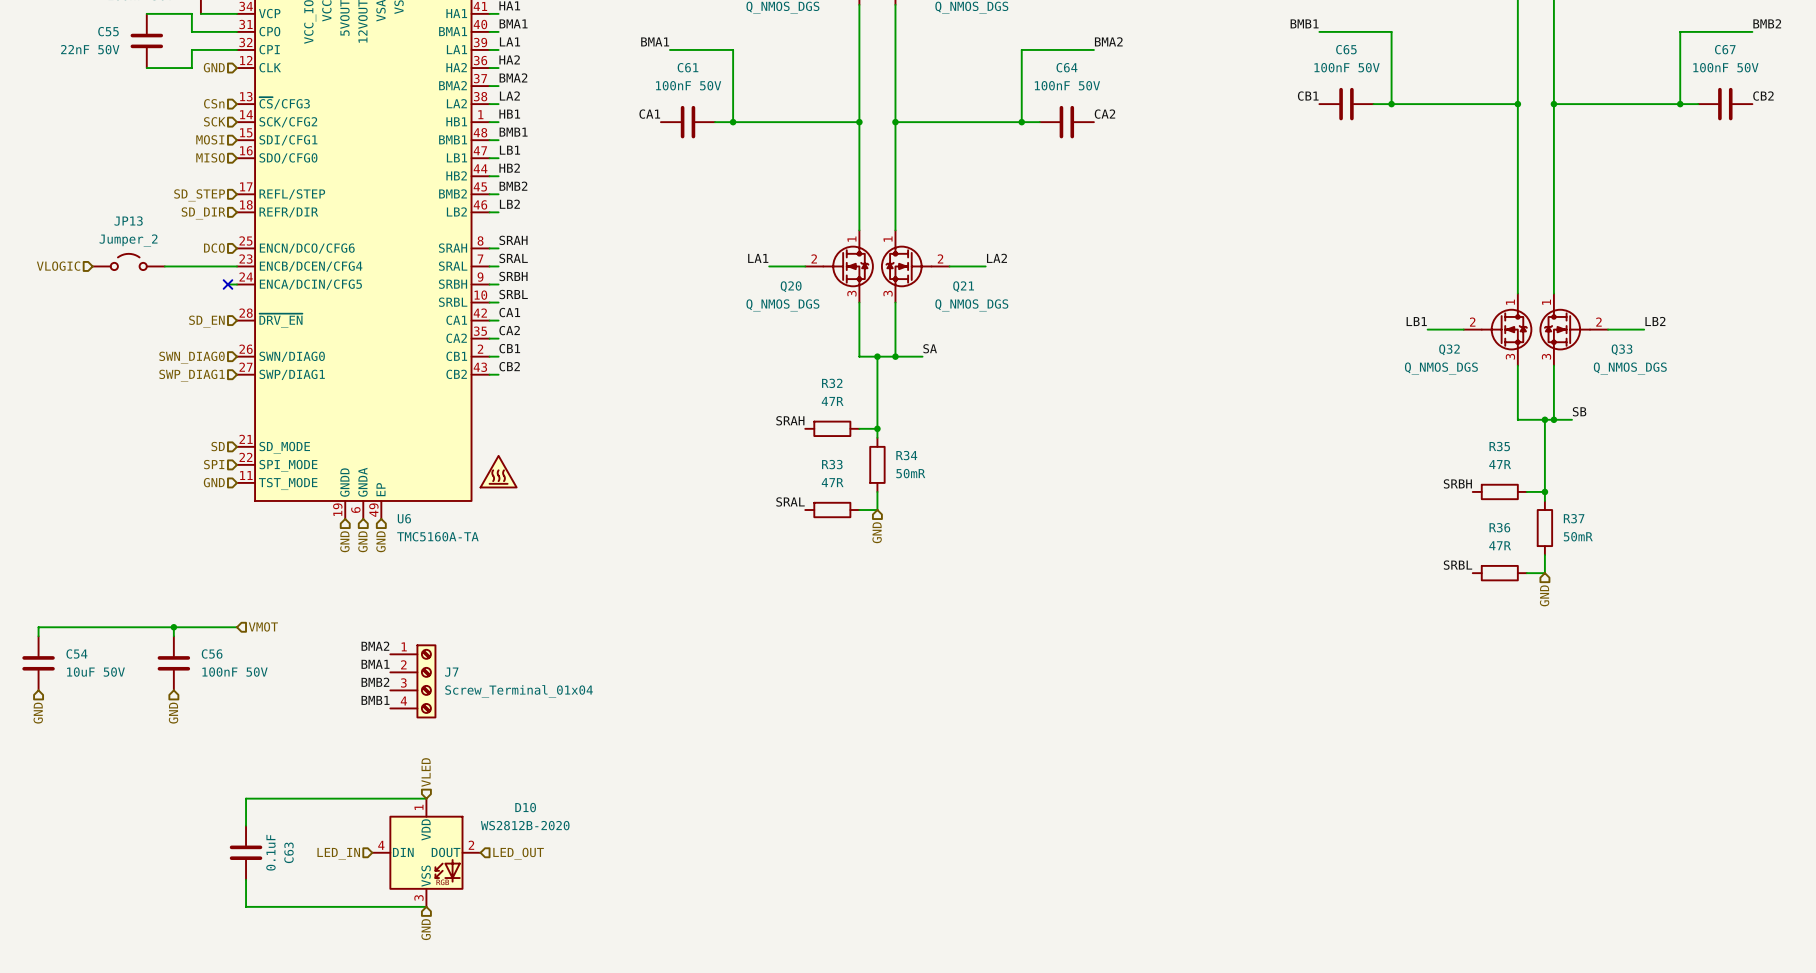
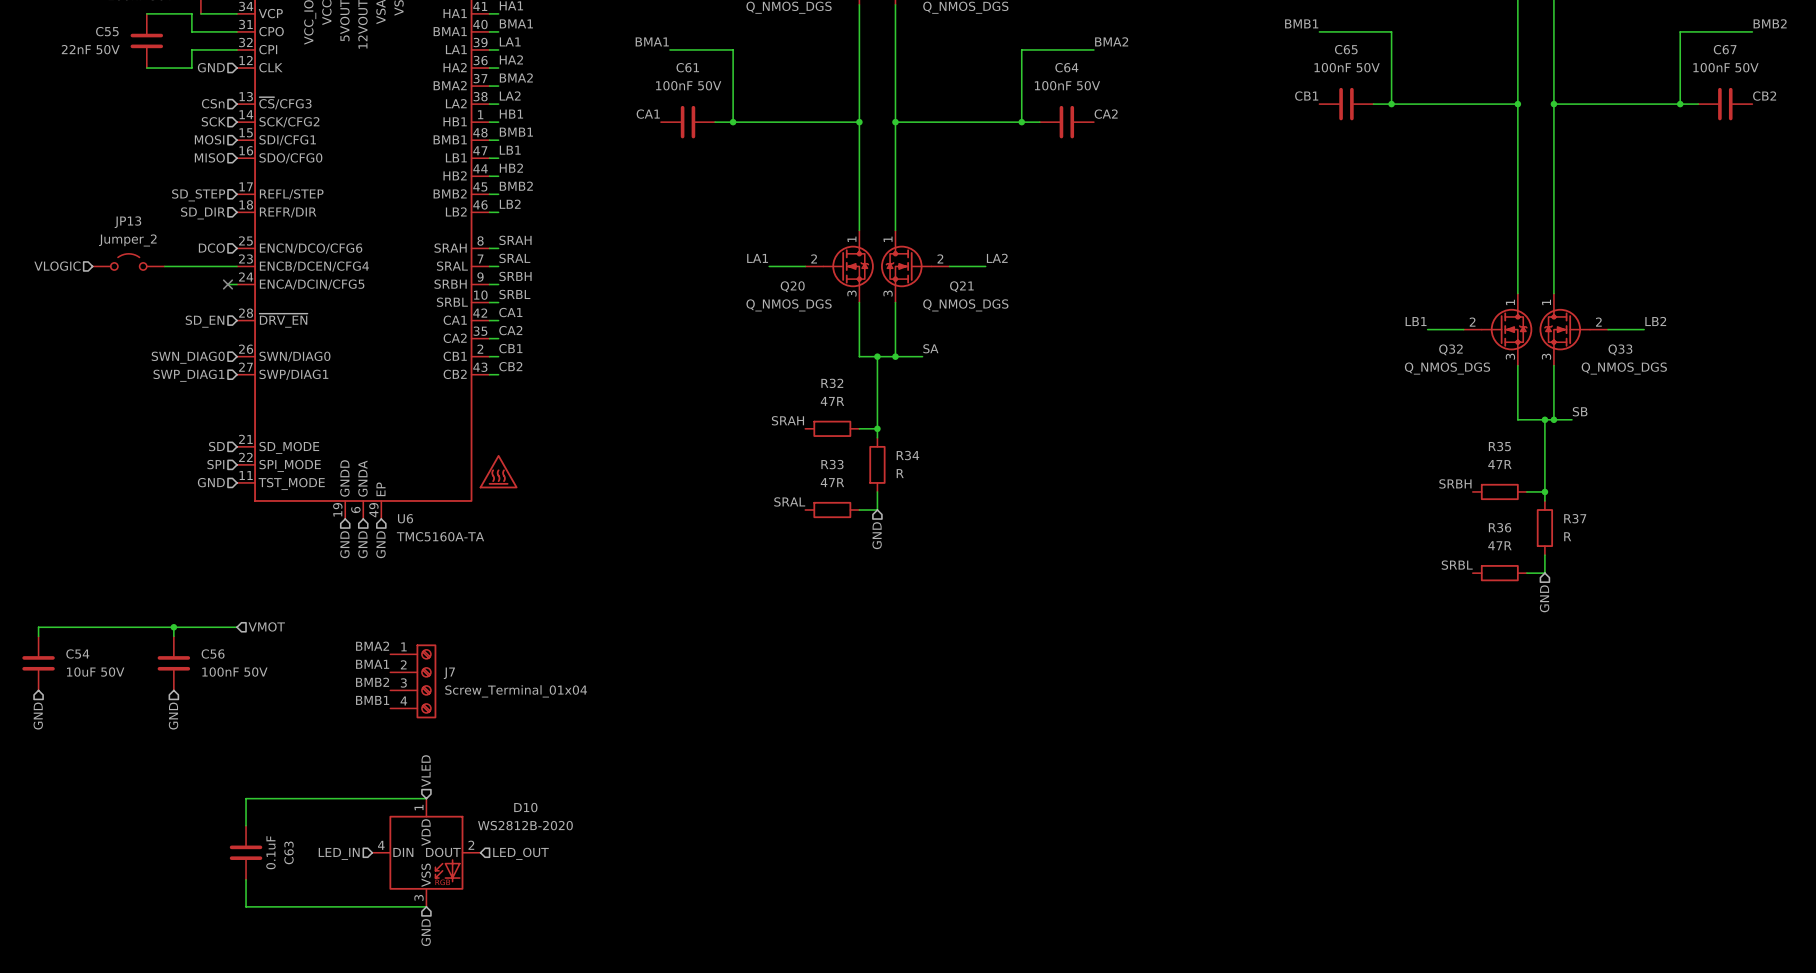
R34 value: 50mR (910, 473) -> R (900, 473)
R37 value: 50mR (1578, 536) -> R (1567, 536)

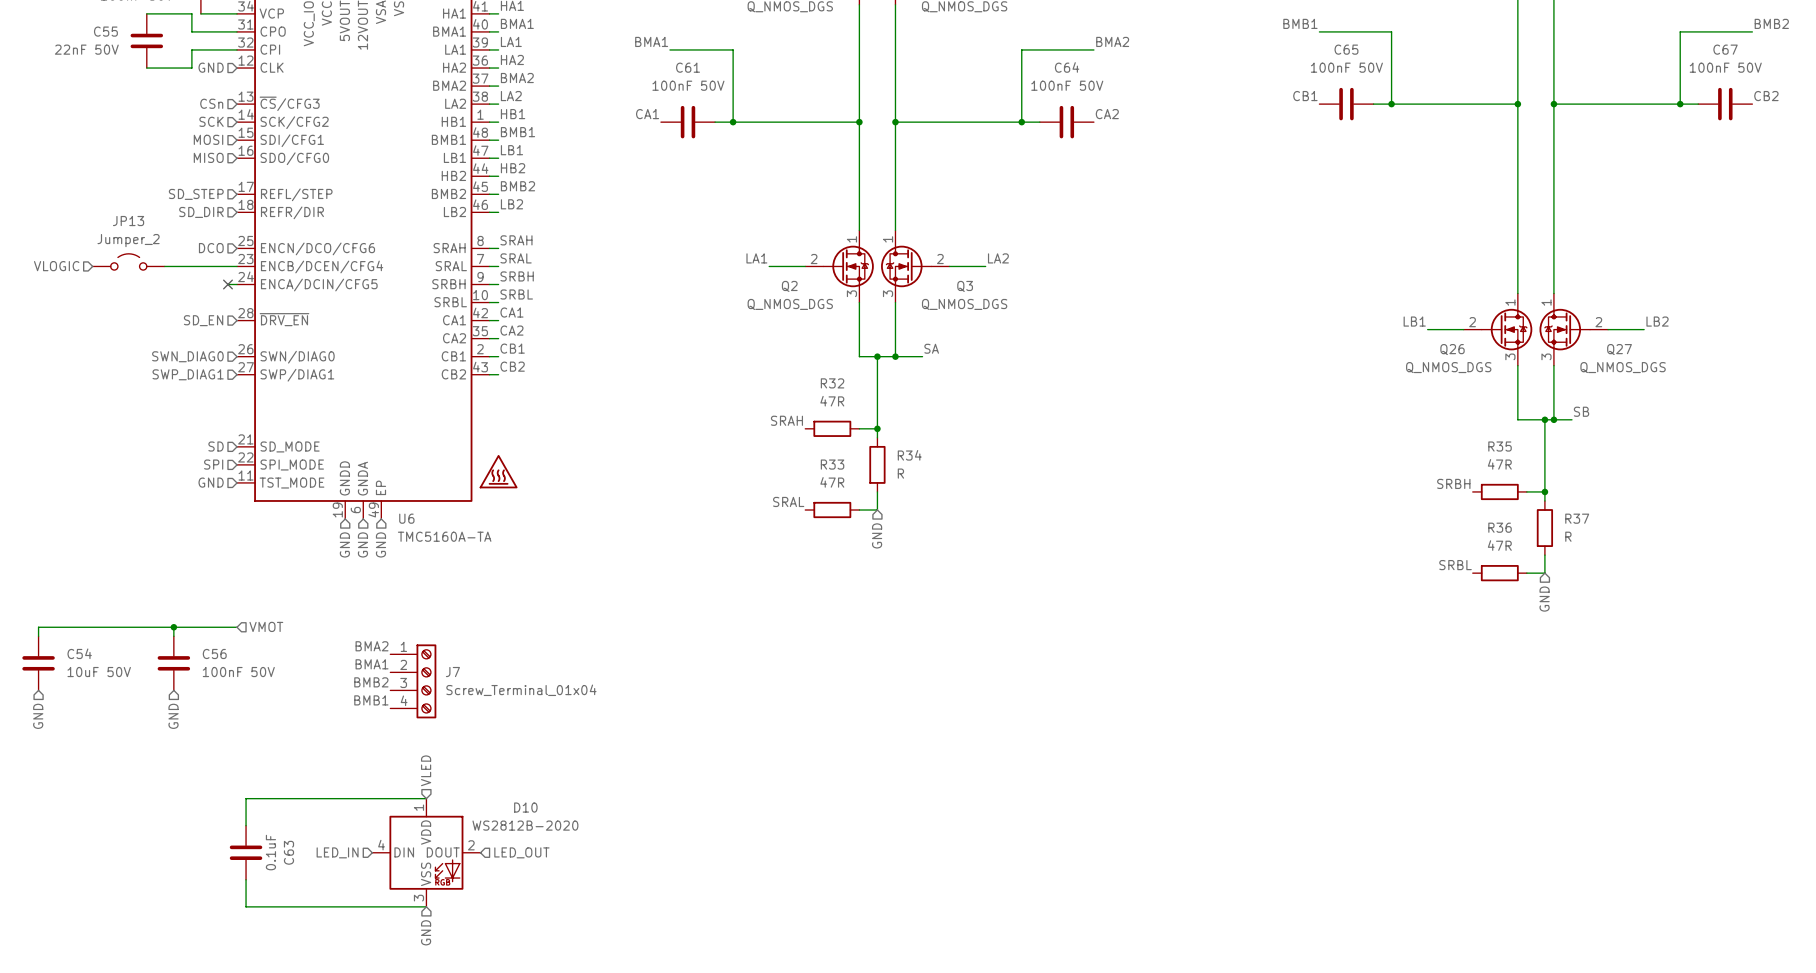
Q20 name: Q20 (792, 286) -> Q2 (789, 286)
Q21 name: Q21 (961, 286) -> Q3 (965, 286)
Q32 name: Q32 (1450, 349) -> Q26 (1452, 349)
Q33 name: Q33 (1620, 349) -> Q27 (1619, 349)

